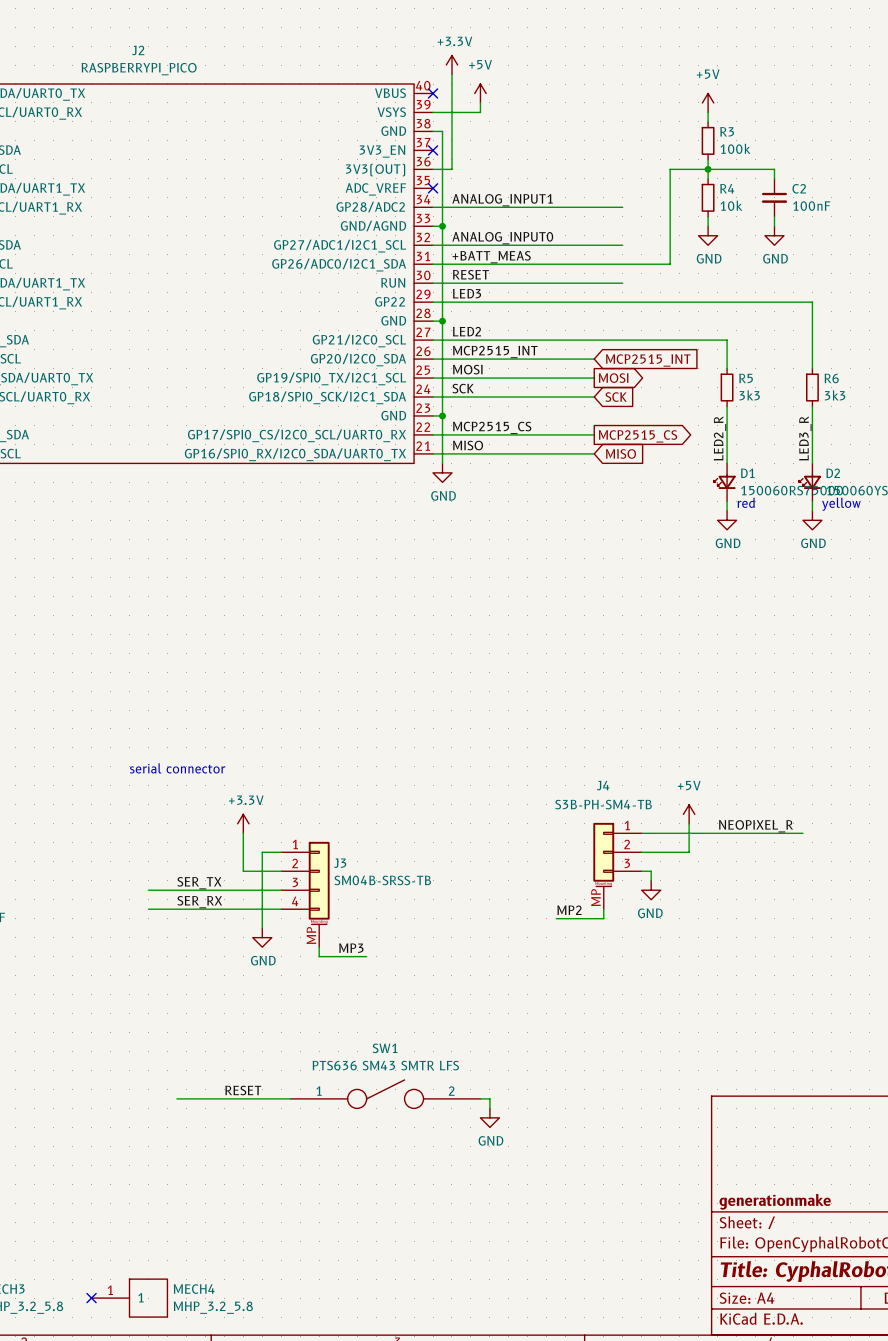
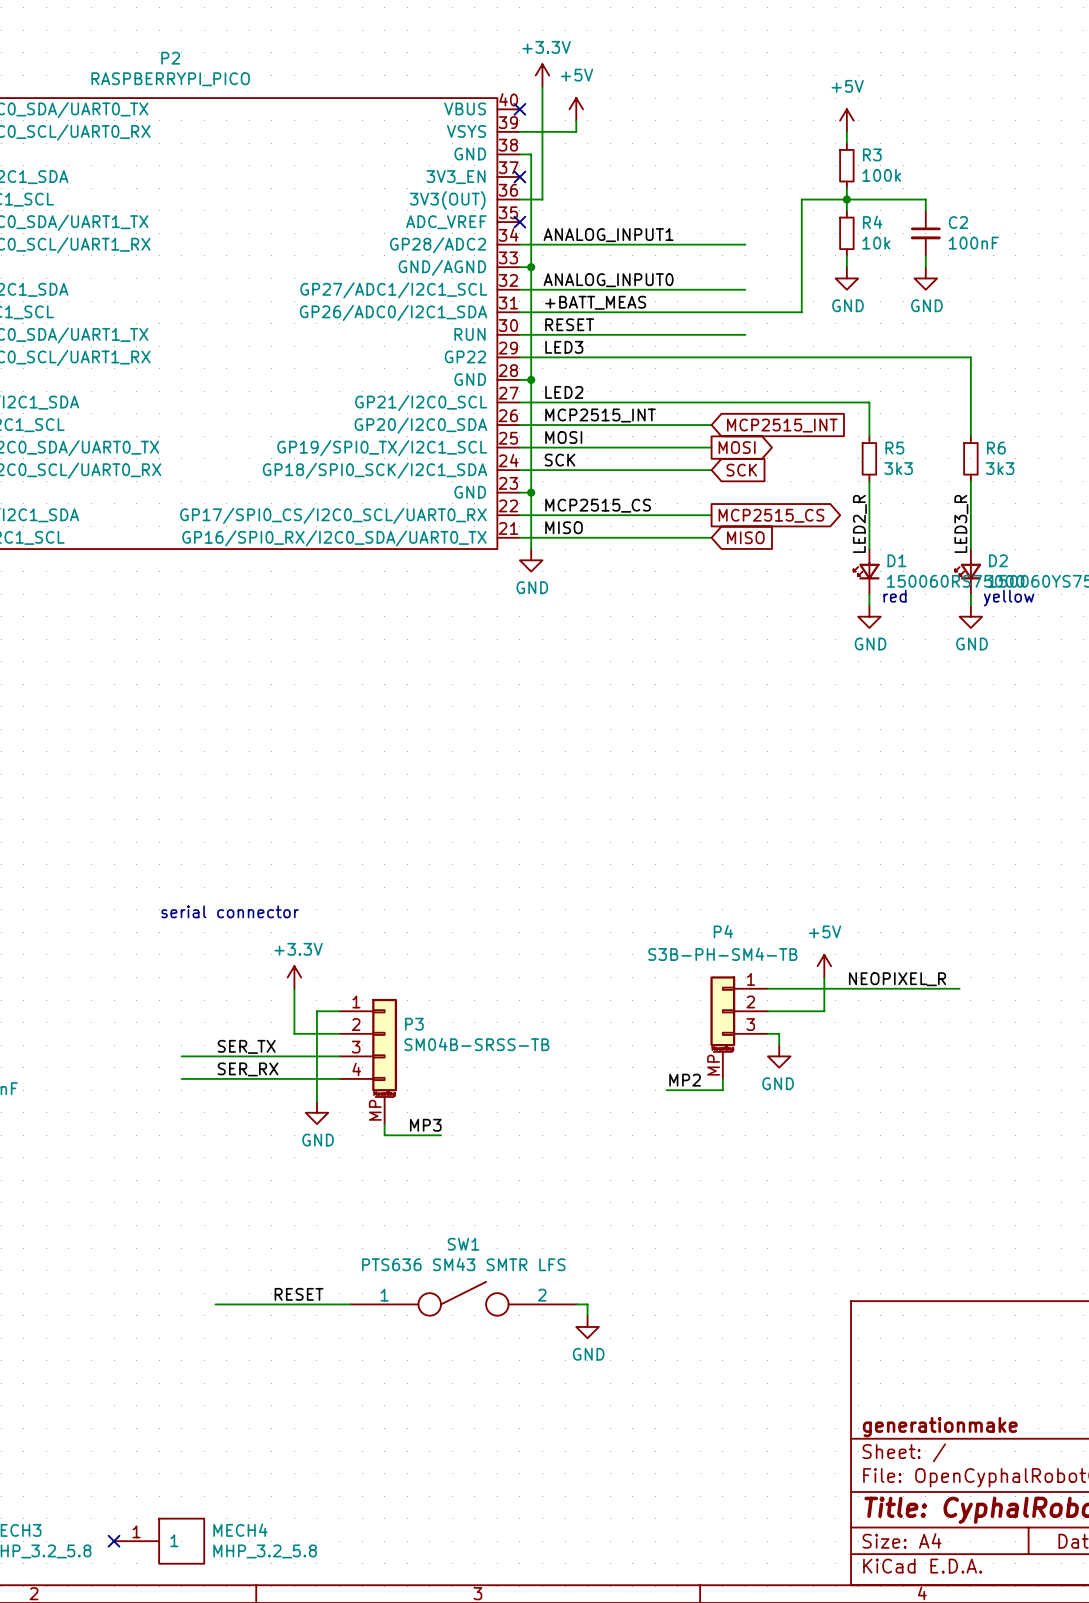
J2 name: J2 (138, 50) -> P2 (170, 58)
J4 name: J4 (603, 785) -> P4 (723, 931)
J3 name: J3 (340, 863) -> P3 (414, 1024)

